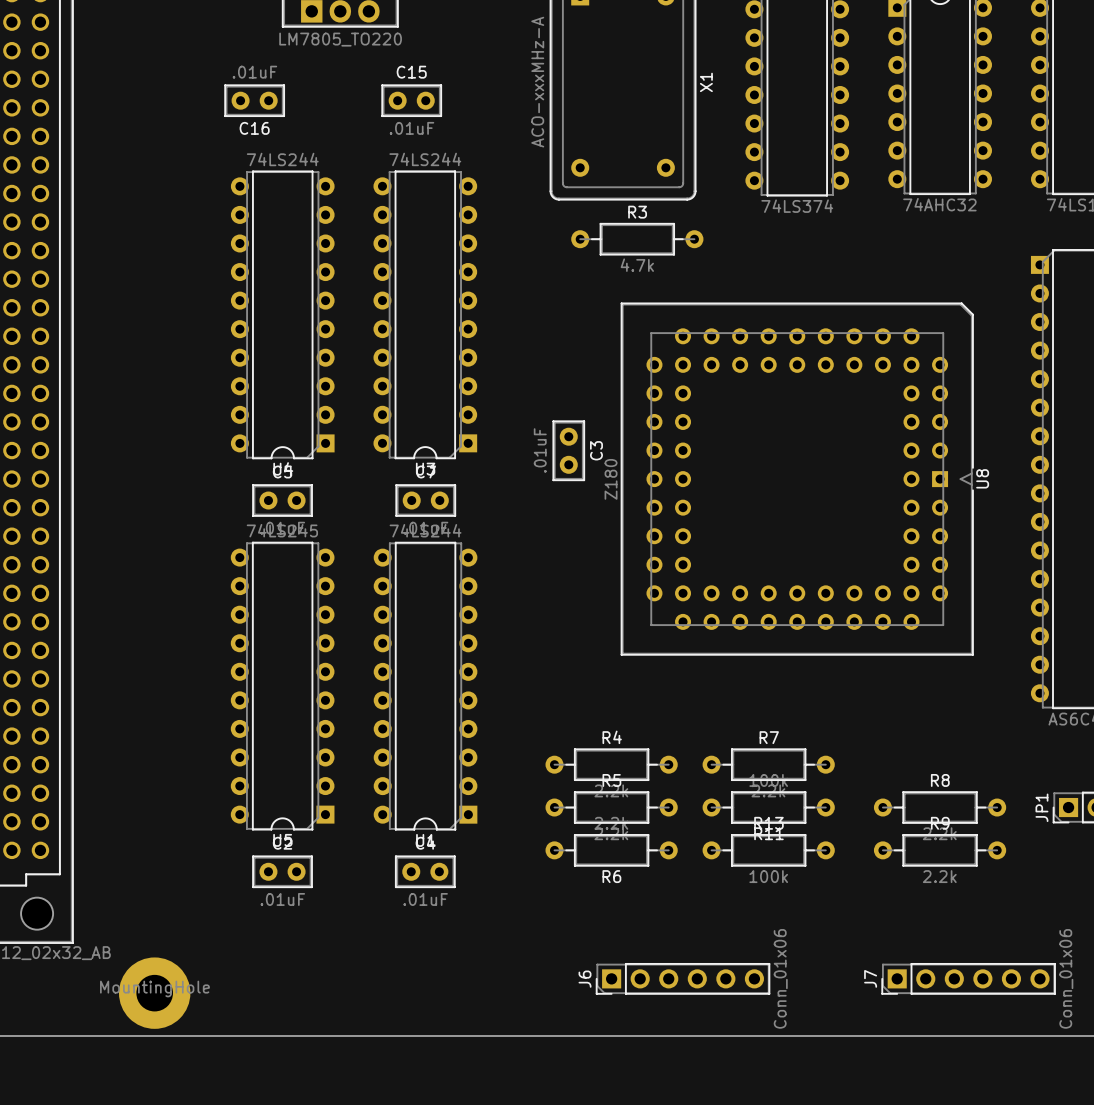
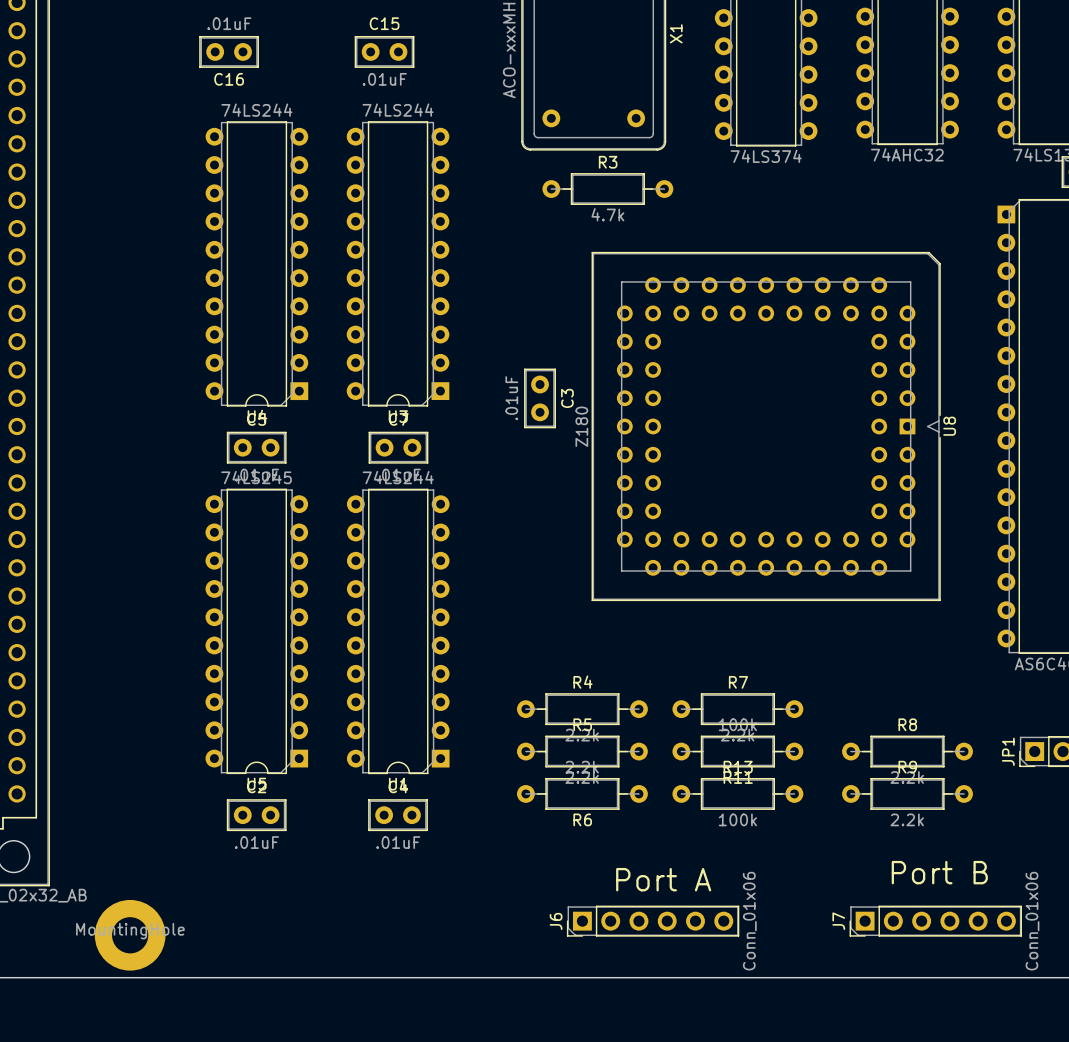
text: none -> Port B (939, 872)
text: none -> Port A (663, 879)

